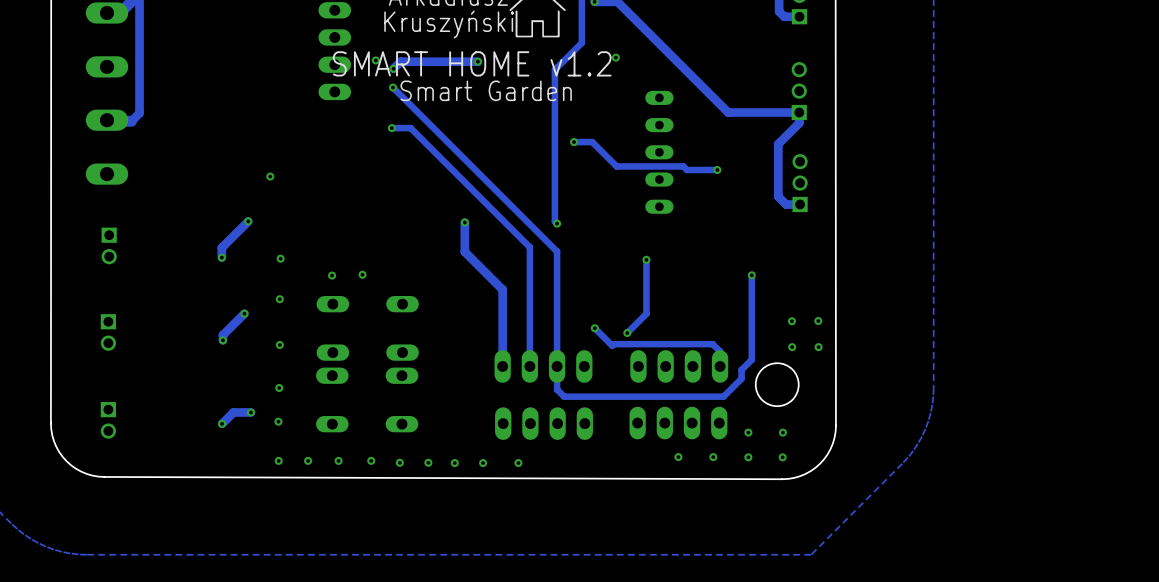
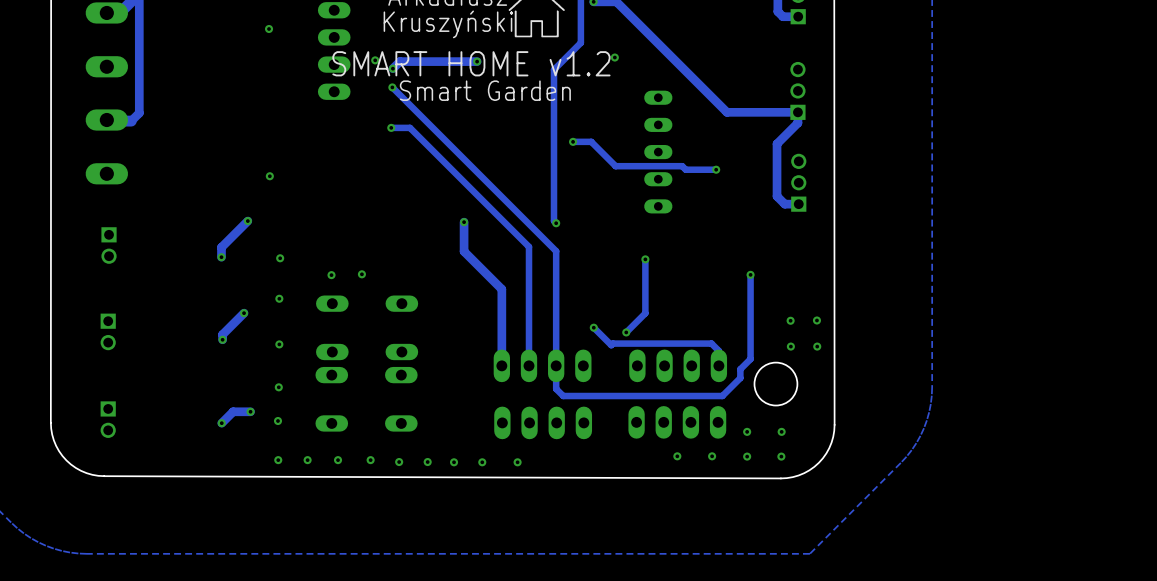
via: none -> (269, 29)

